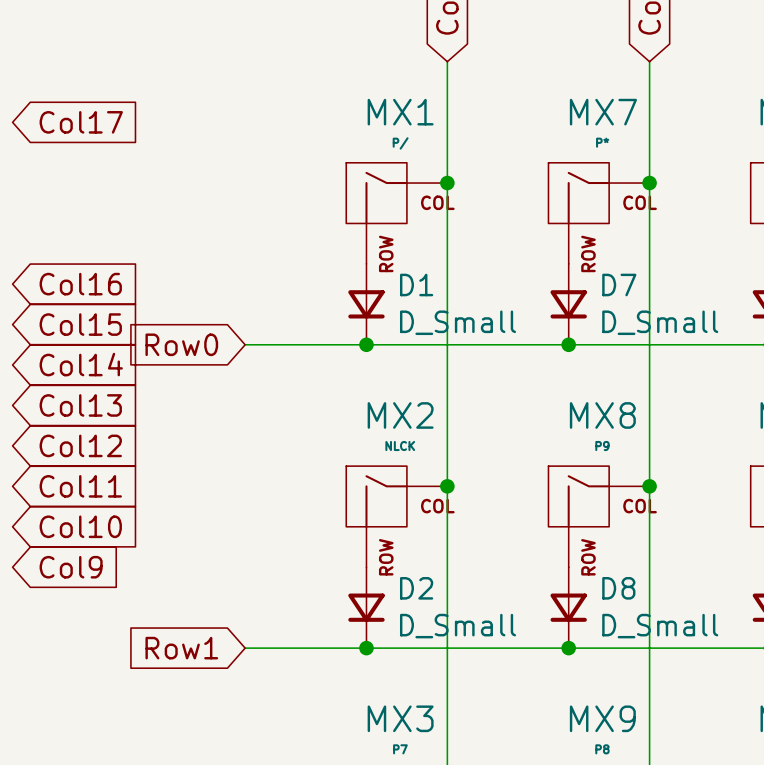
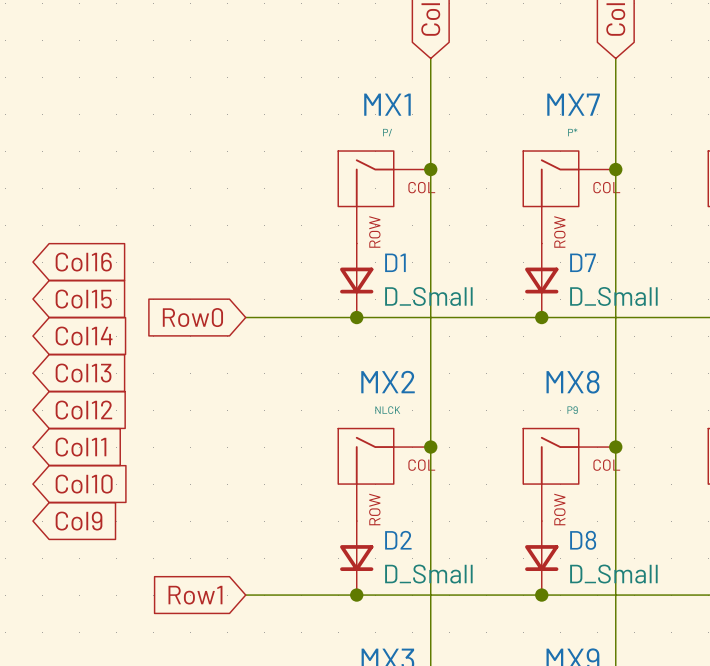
global label: Col17 (81, 122) -> none

